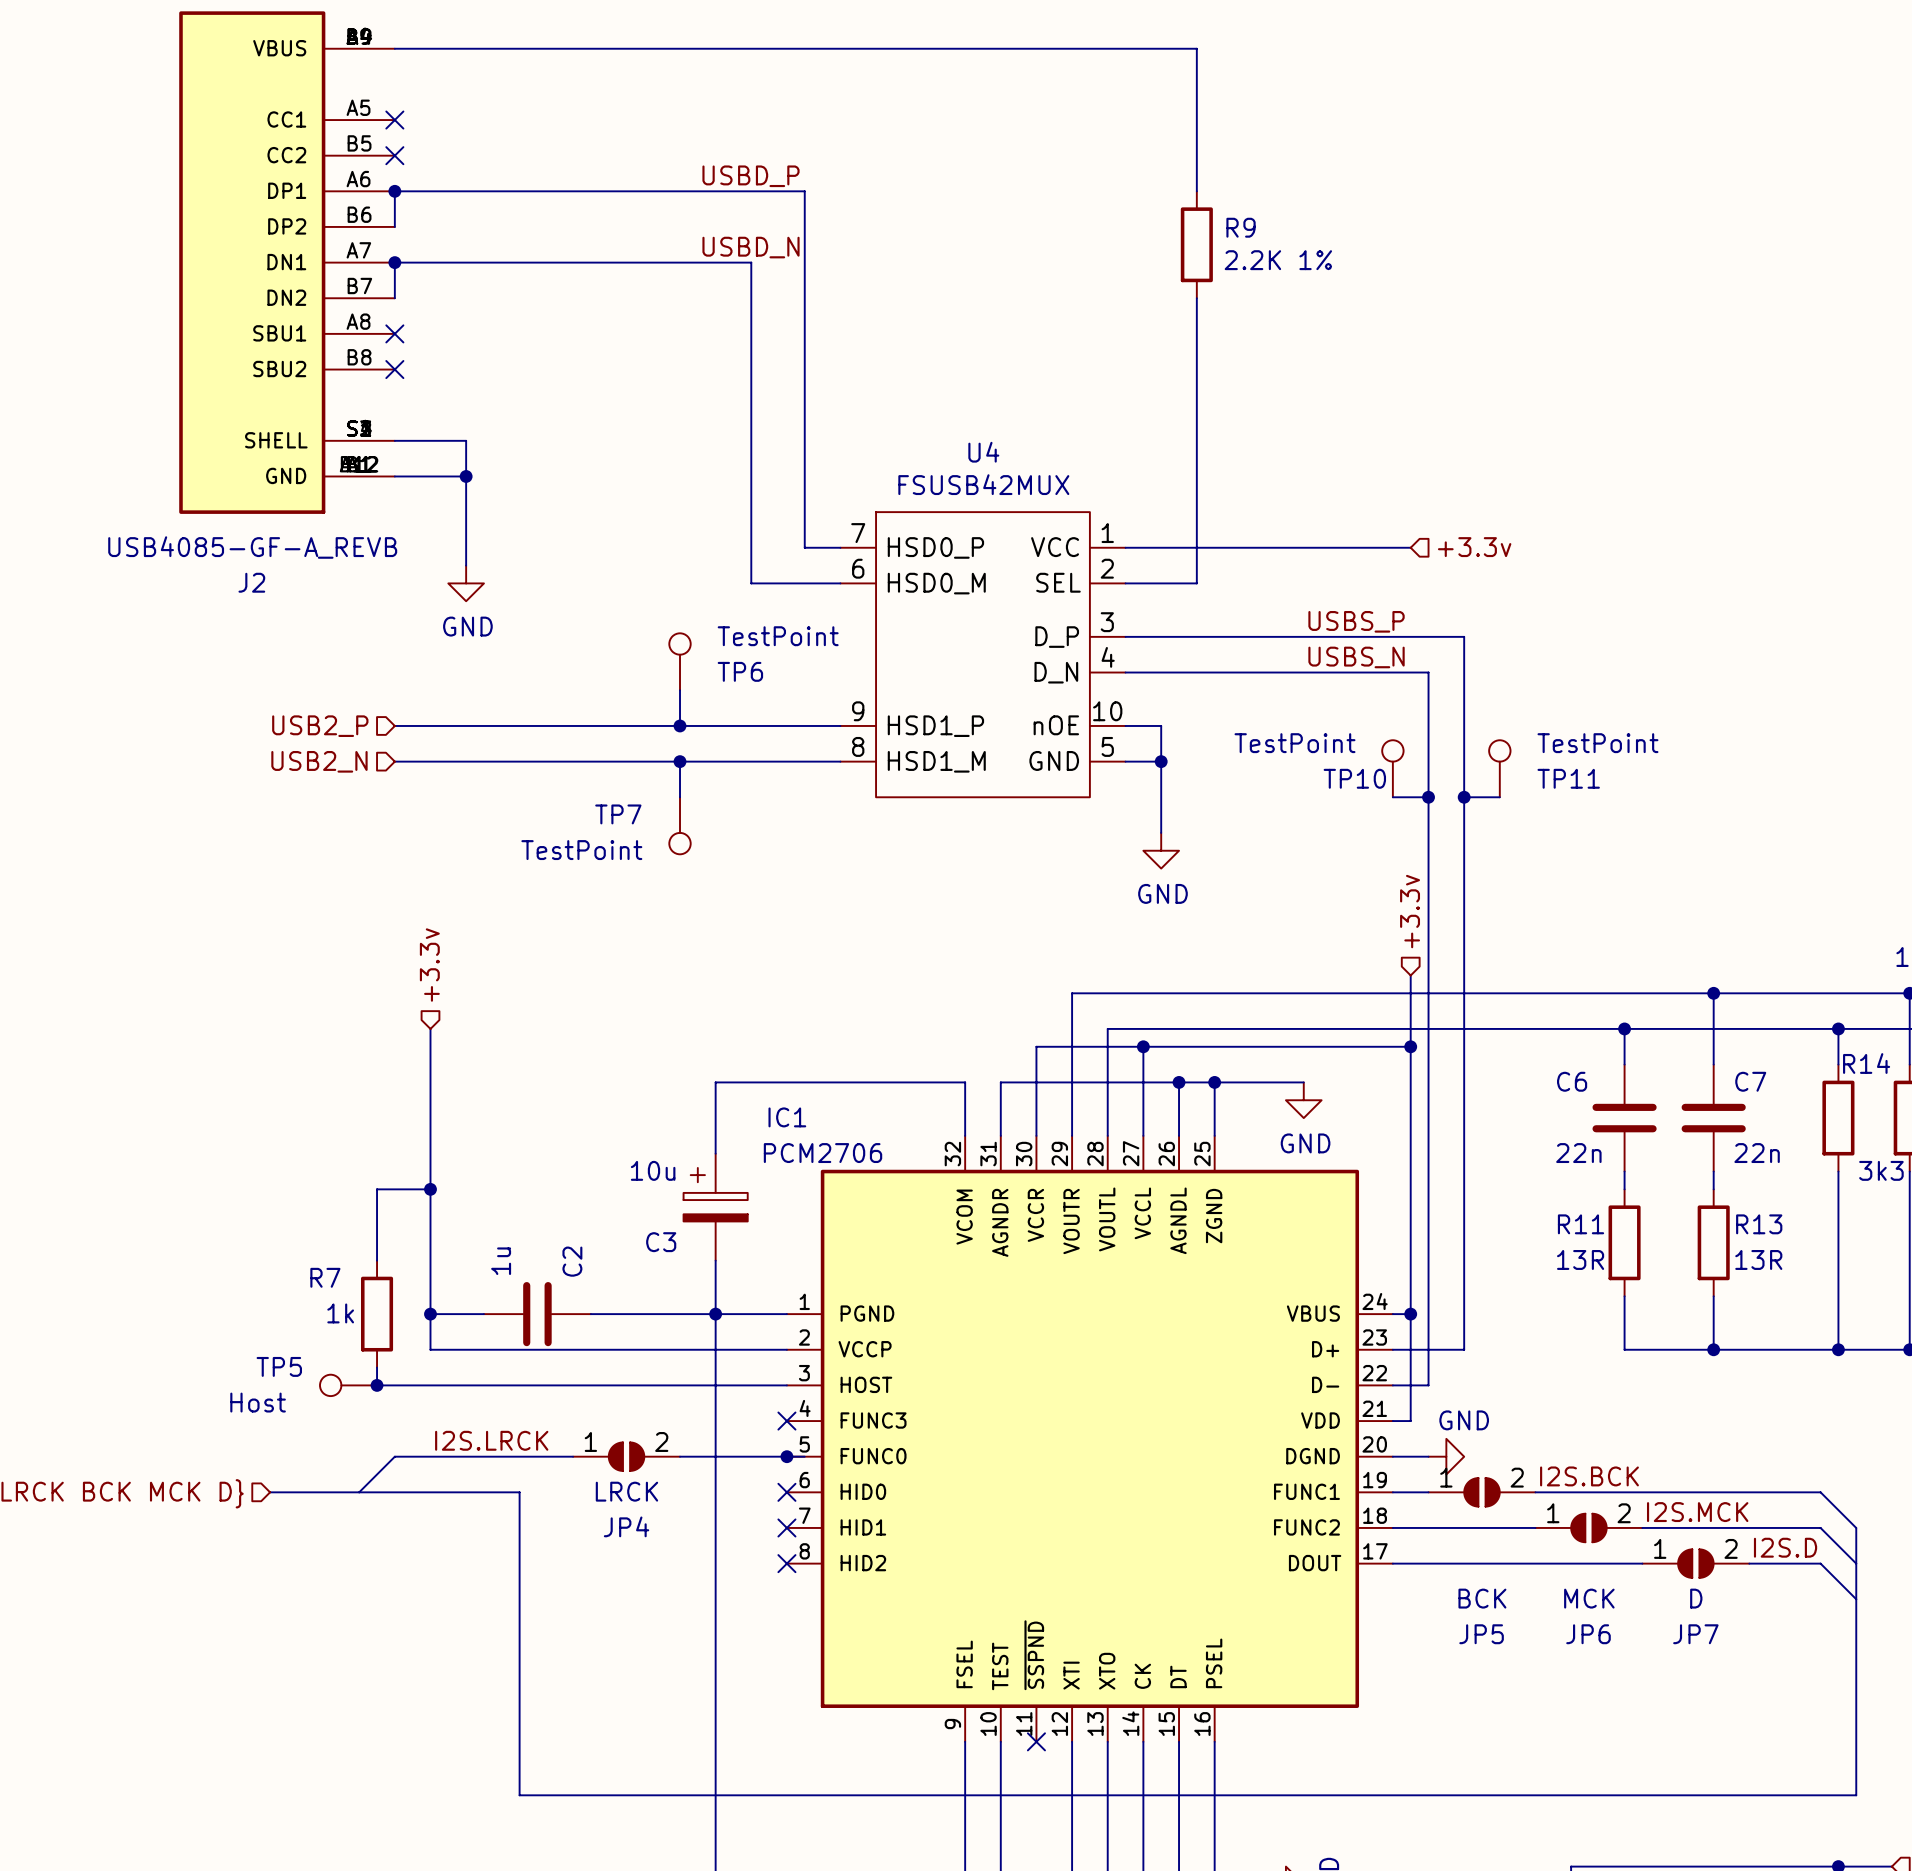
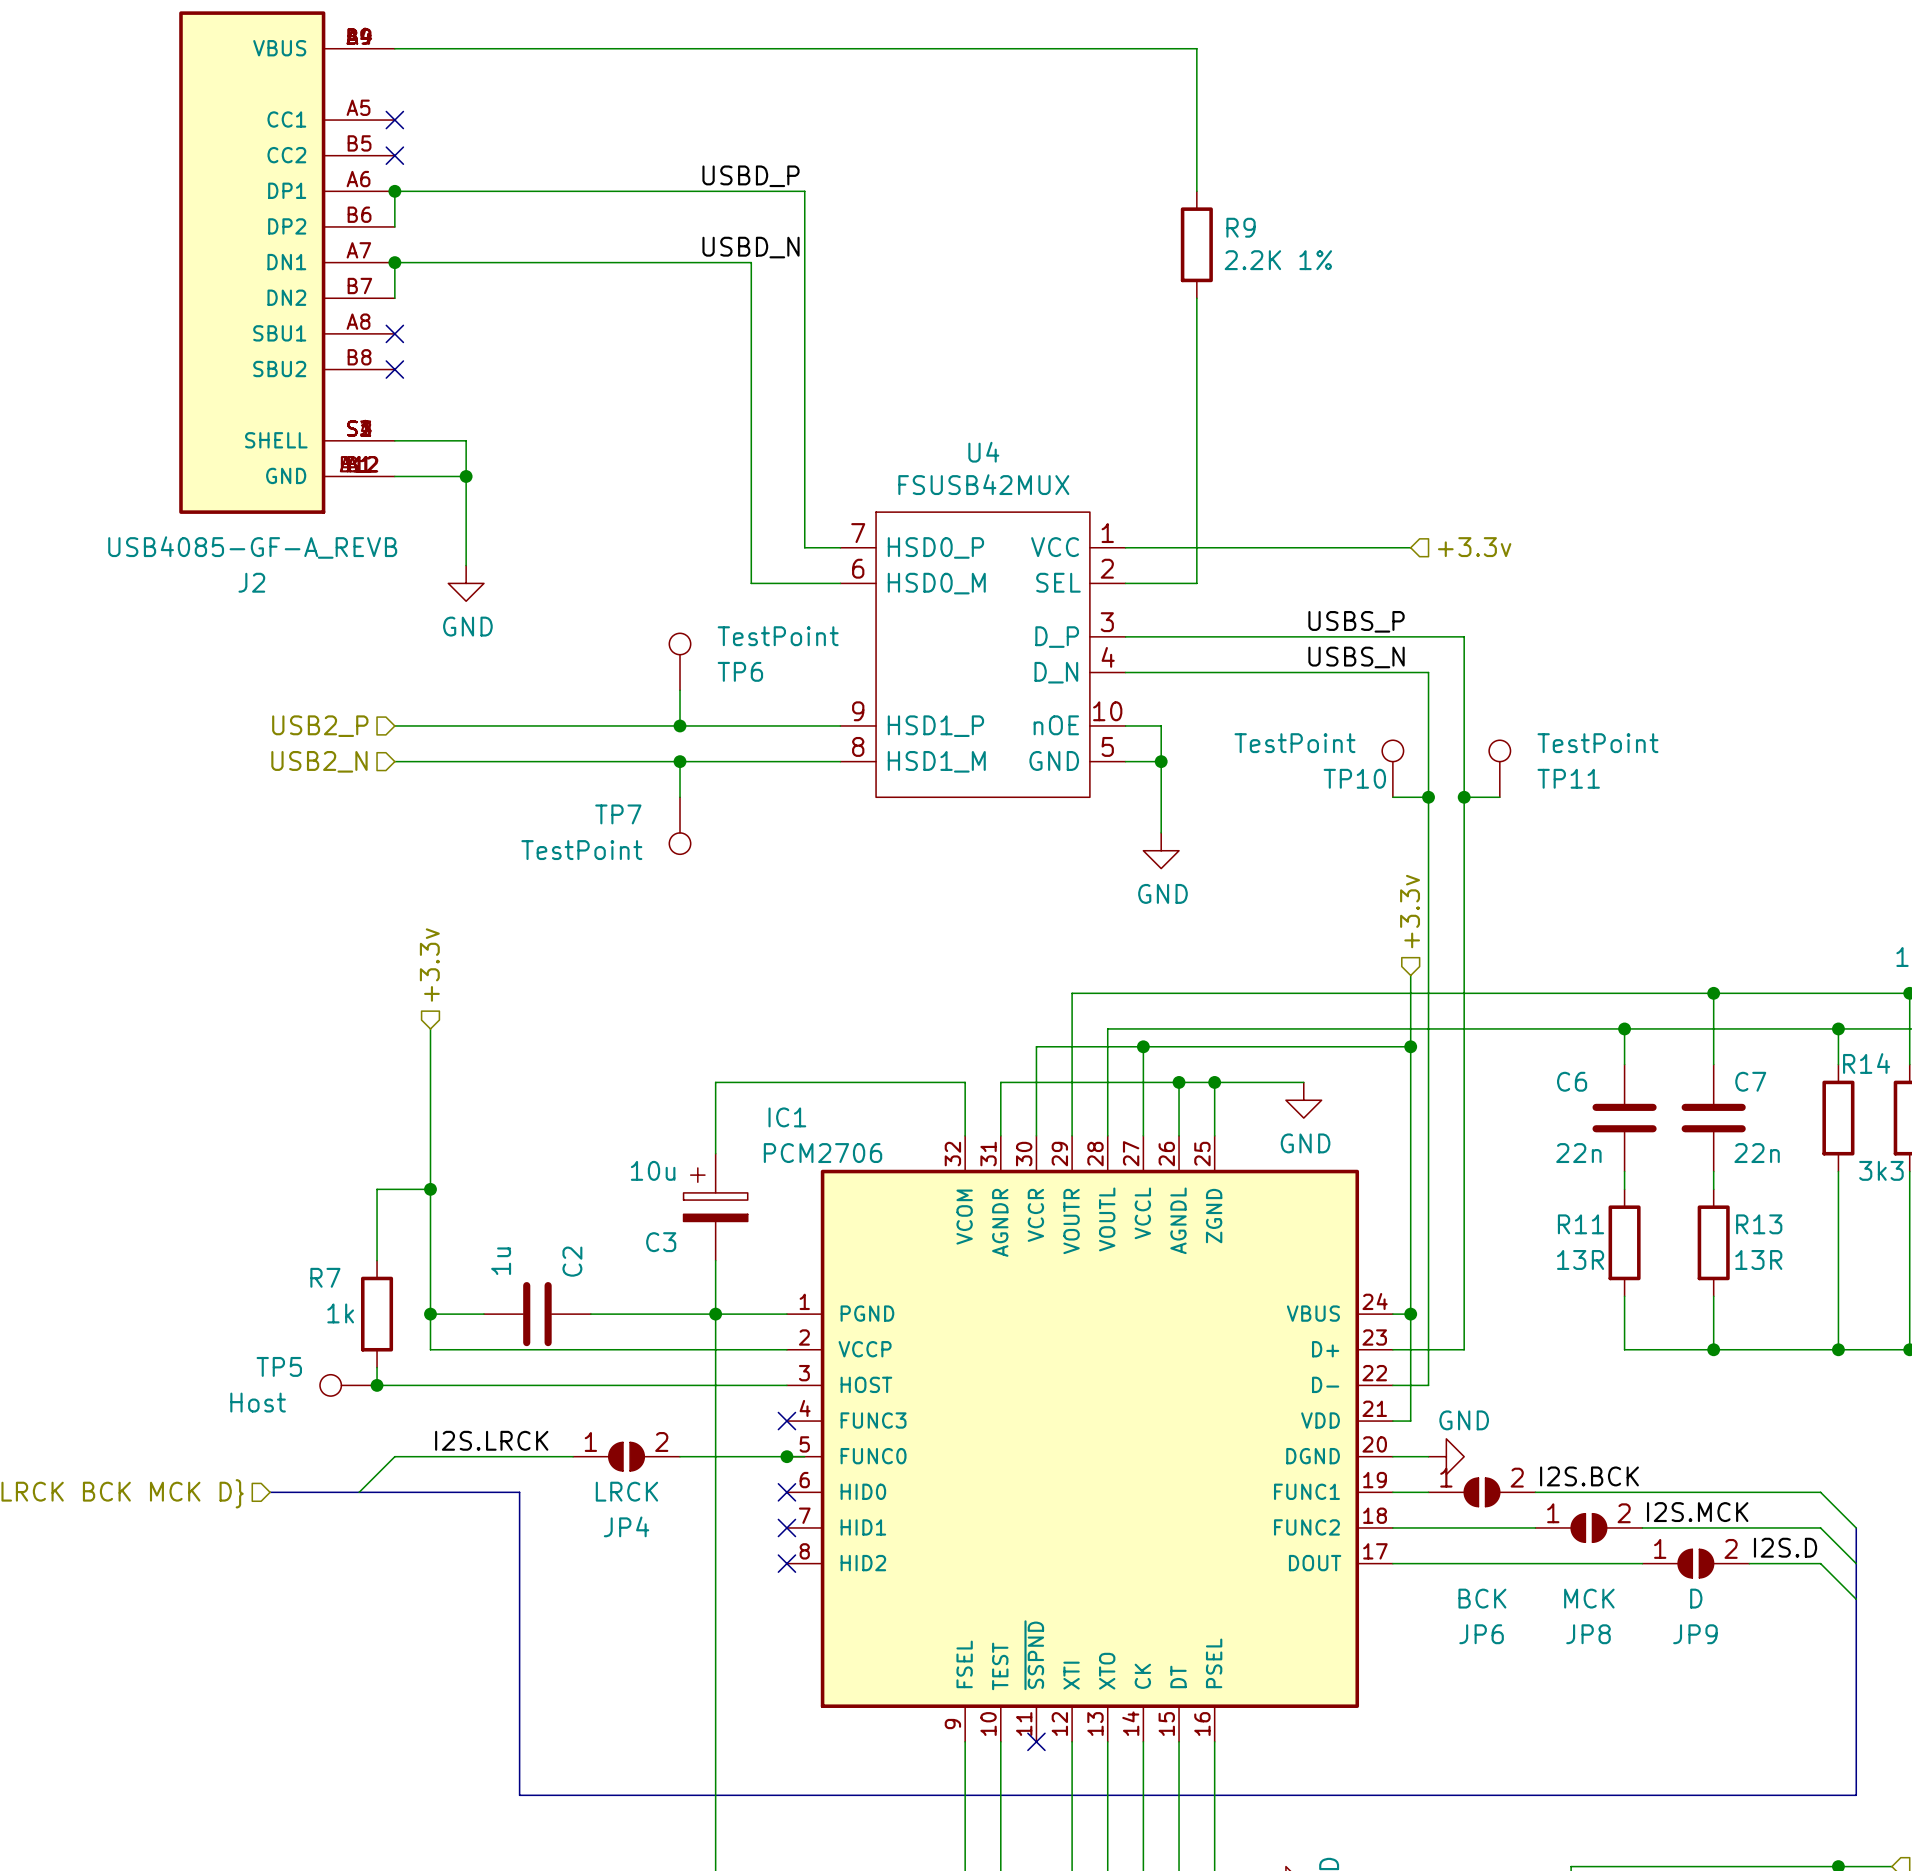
JP5 name: JP5 (1481, 1634) -> JP6 (1481, 1634)
JP6 name: JP6 (1588, 1634) -> JP8 (1588, 1634)
JP7 name: JP7 (1695, 1634) -> JP9 (1695, 1634)

